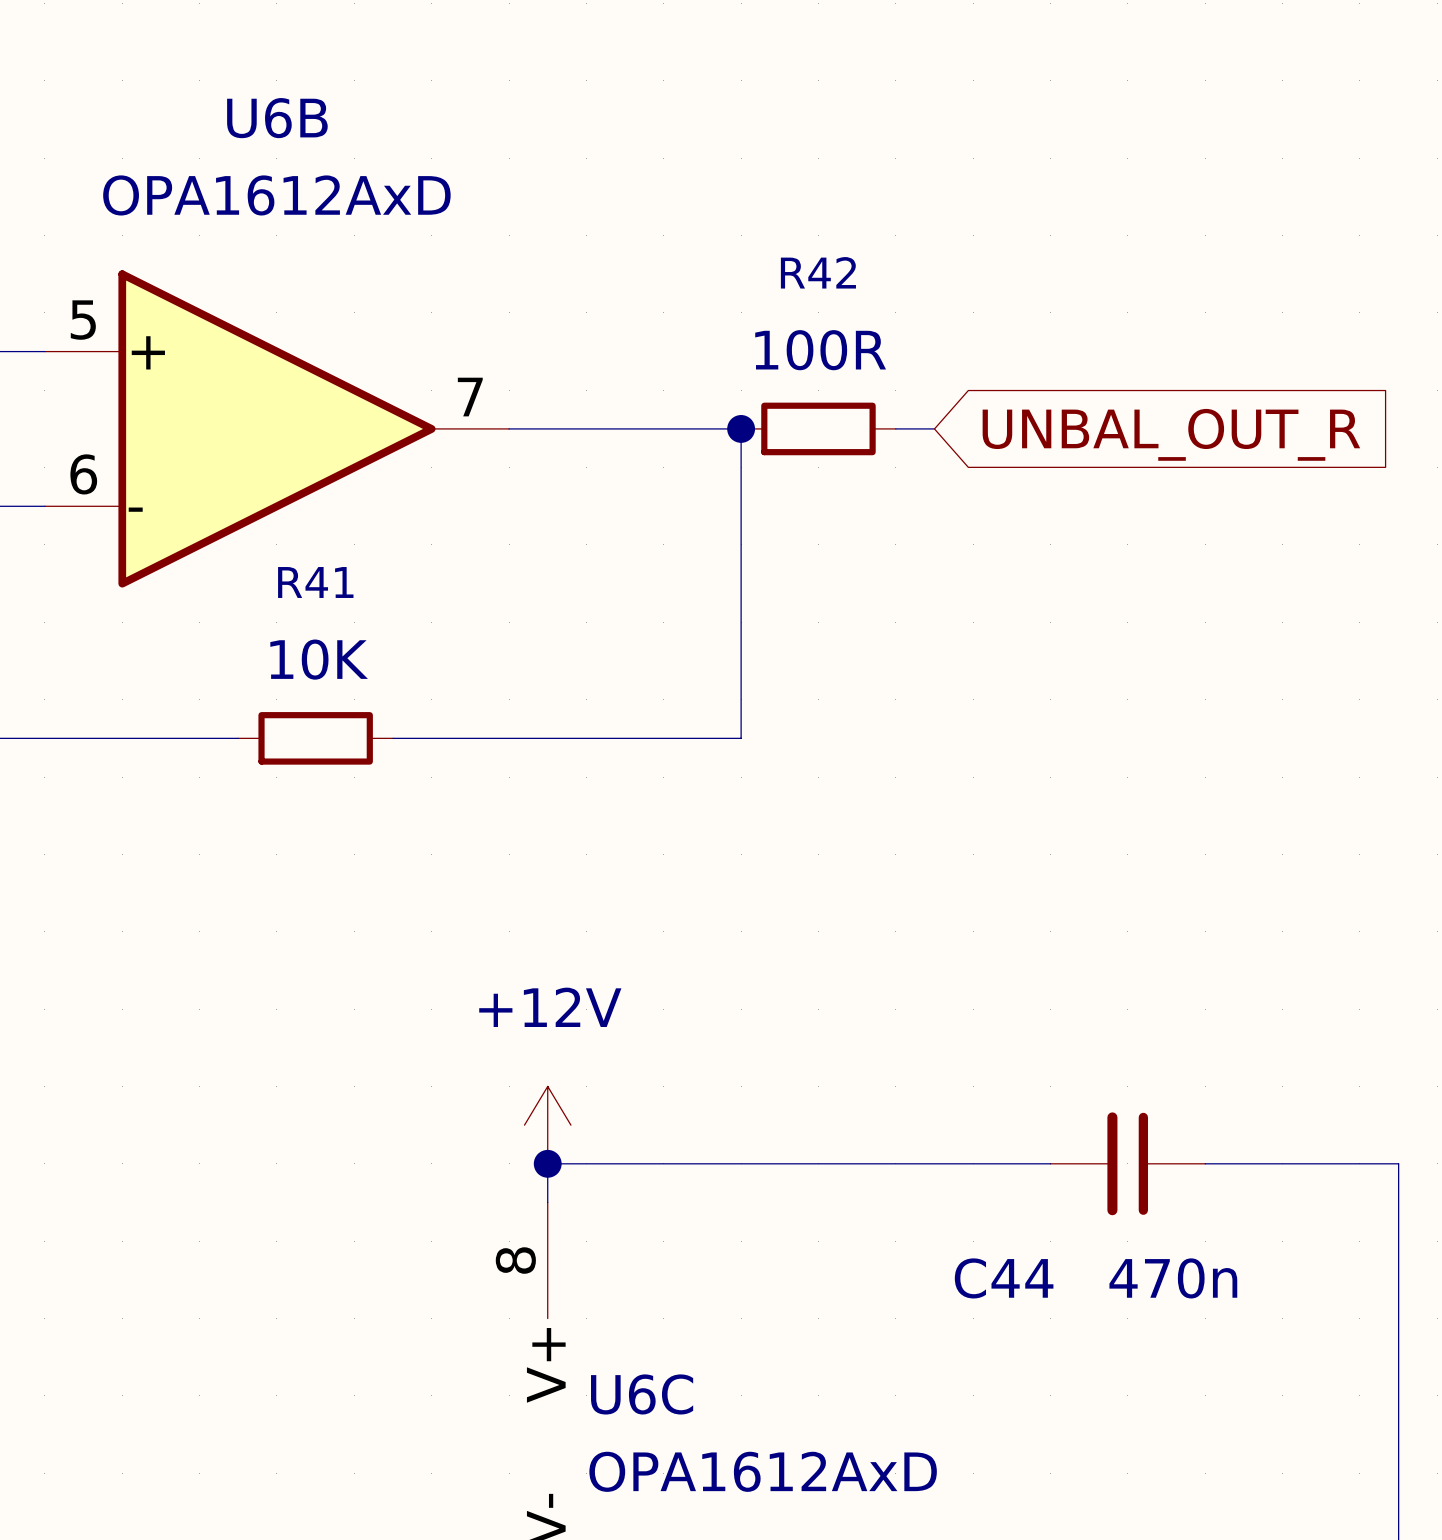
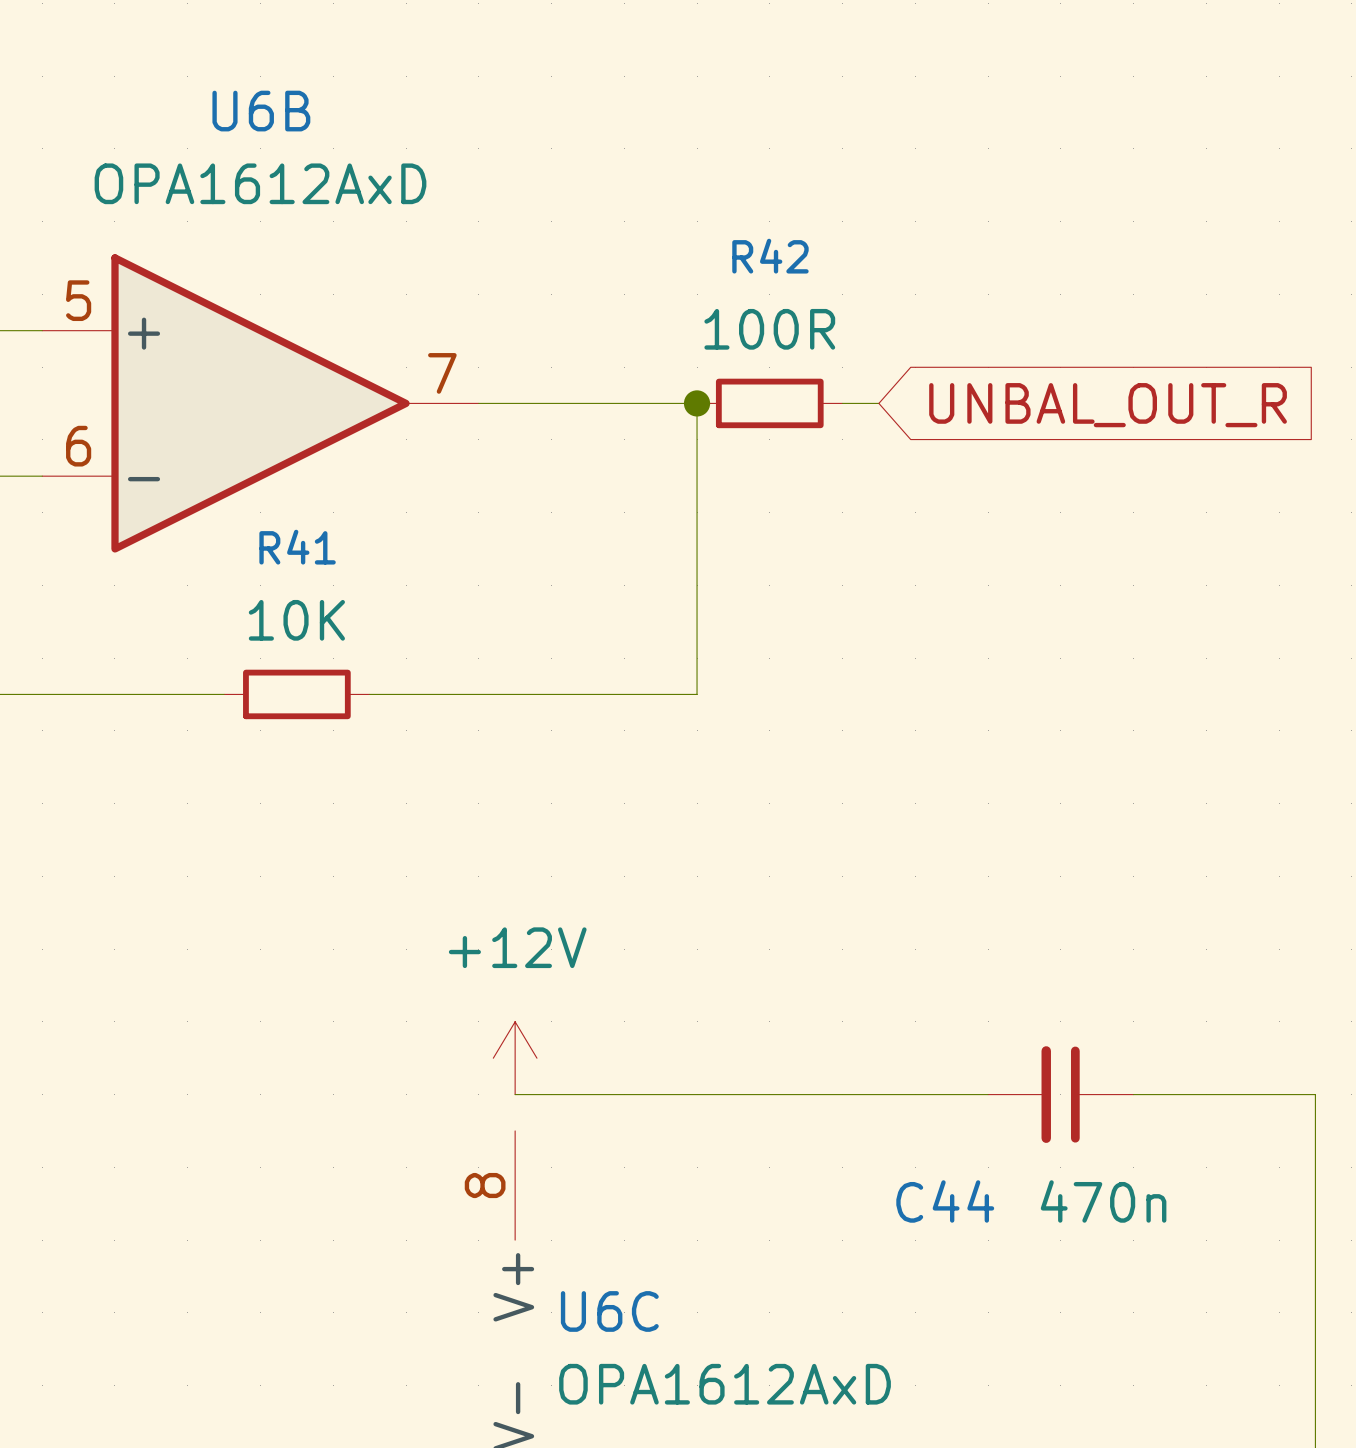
wire: (547, 1163) (547, 1202) -> none
junction: (547, 1163) -> none

